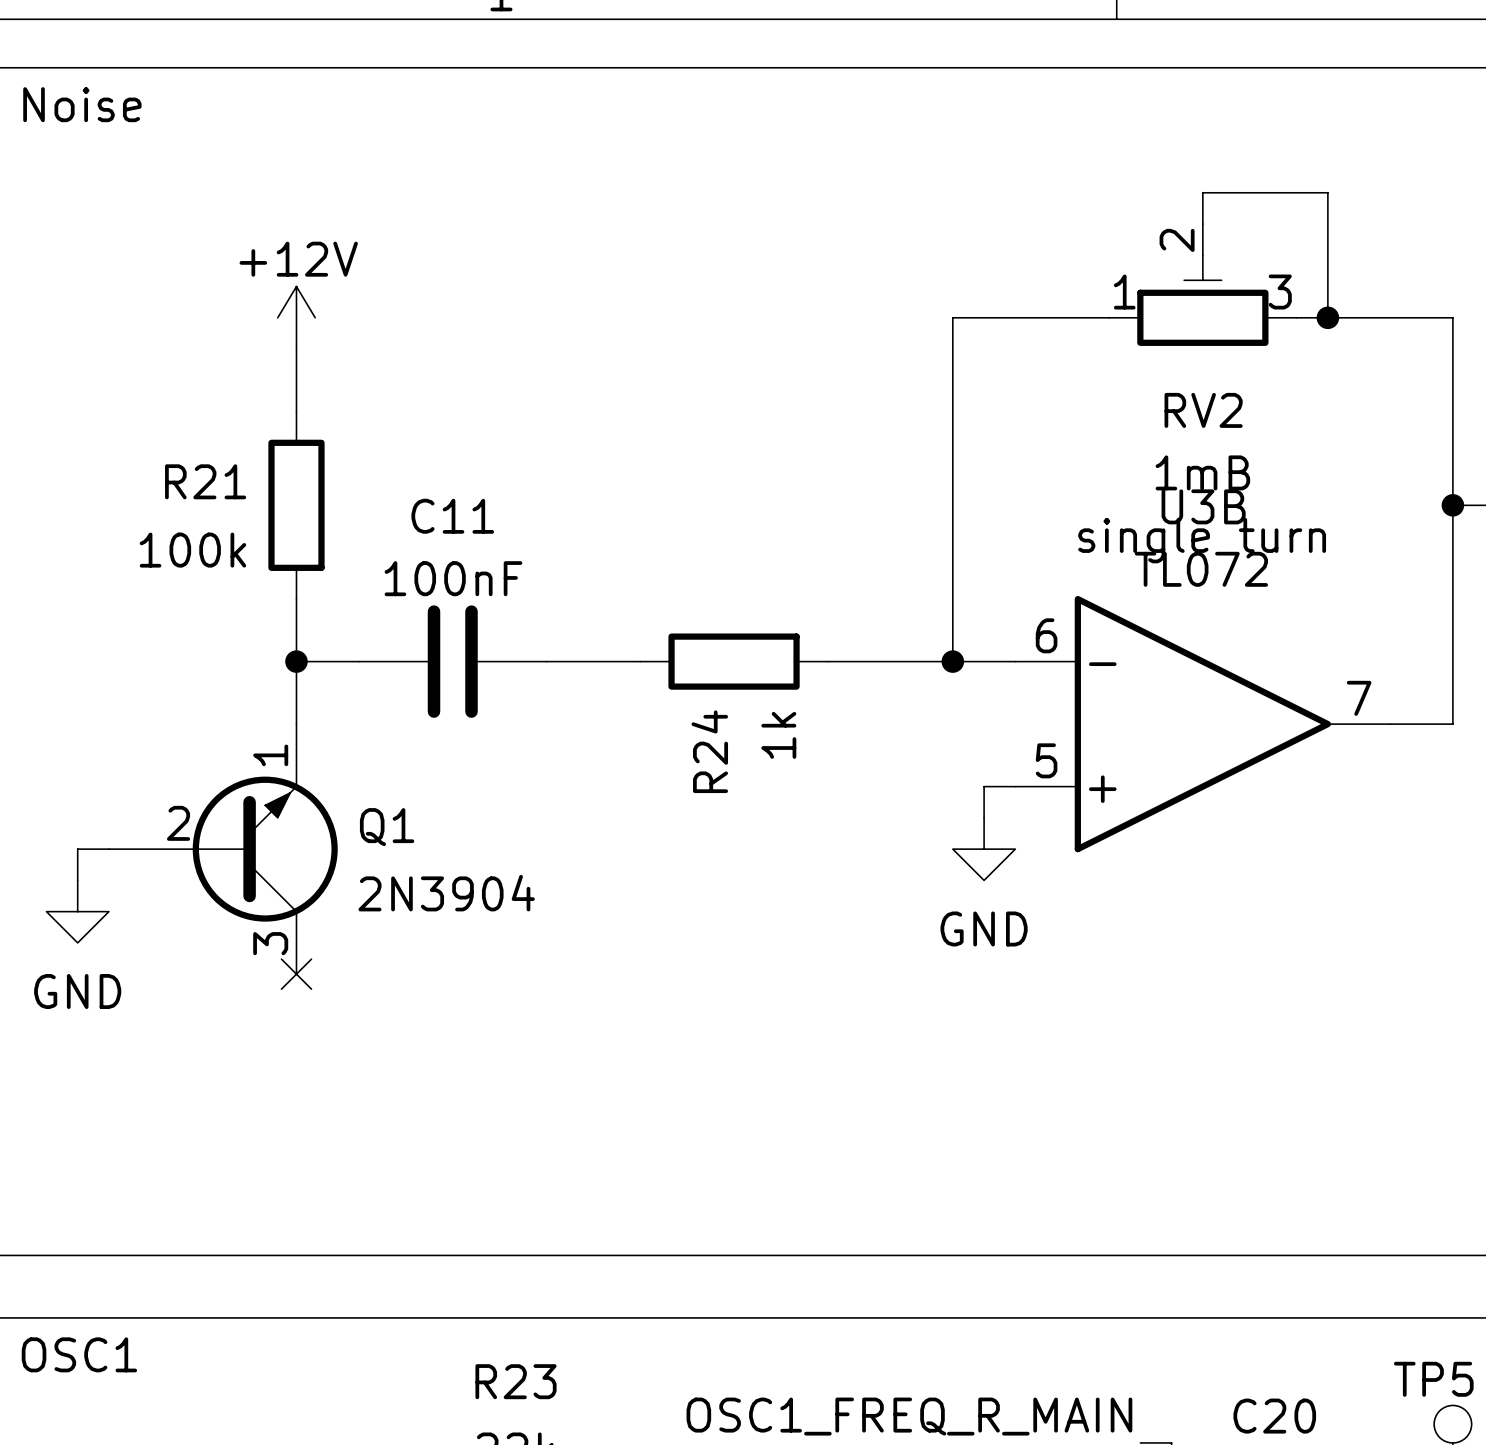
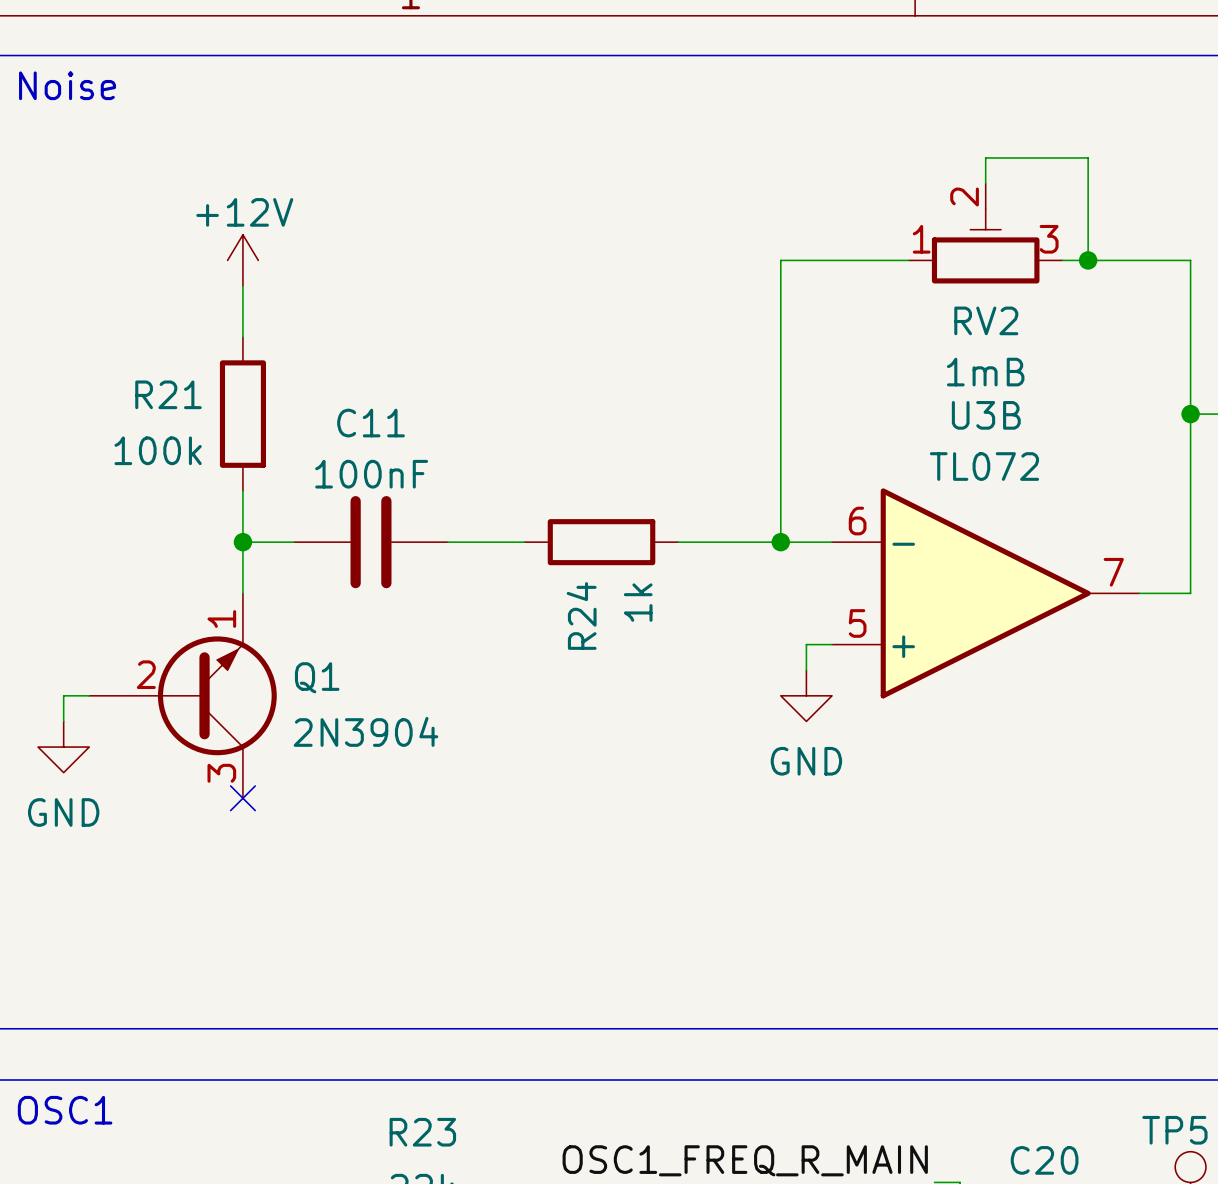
RV2 name position: RV2 (1203, 410) -> RV2 (986, 320)
RV2 value position: 1mB (1202, 472) -> 1mB (985, 372)
RV2 text: single turn (1202, 540) -> none

